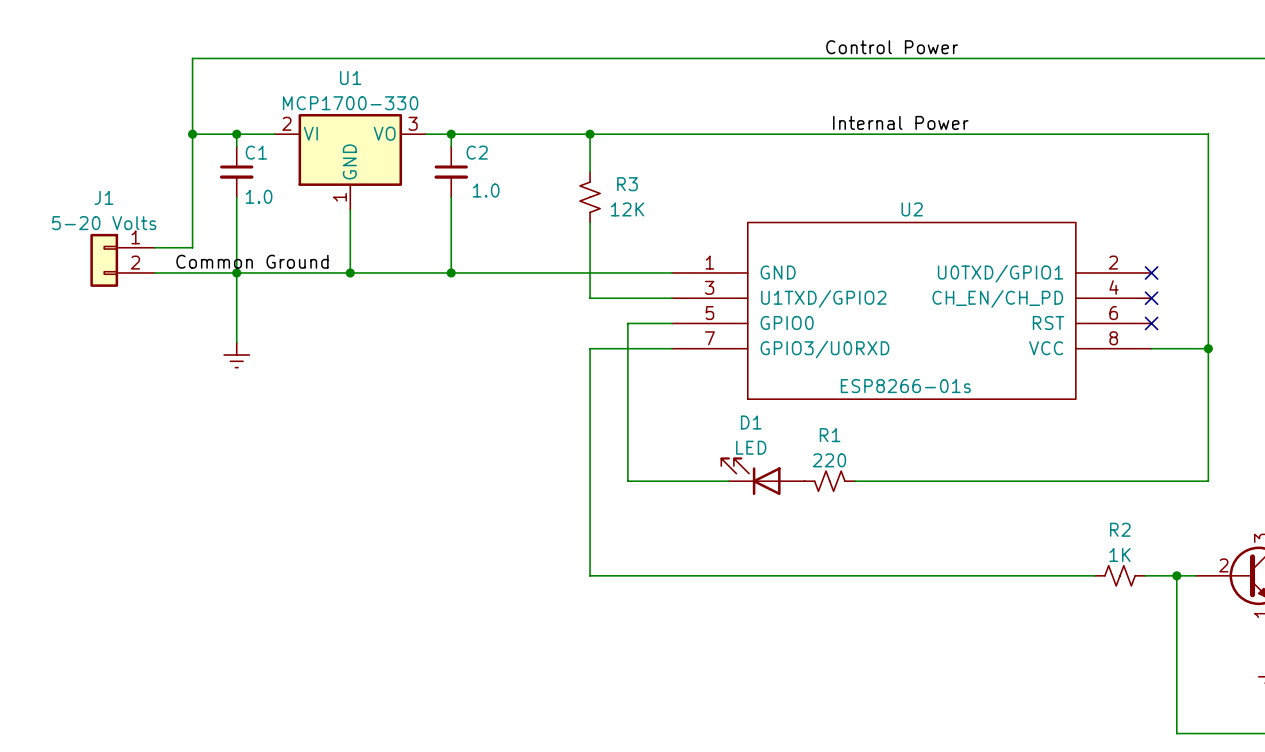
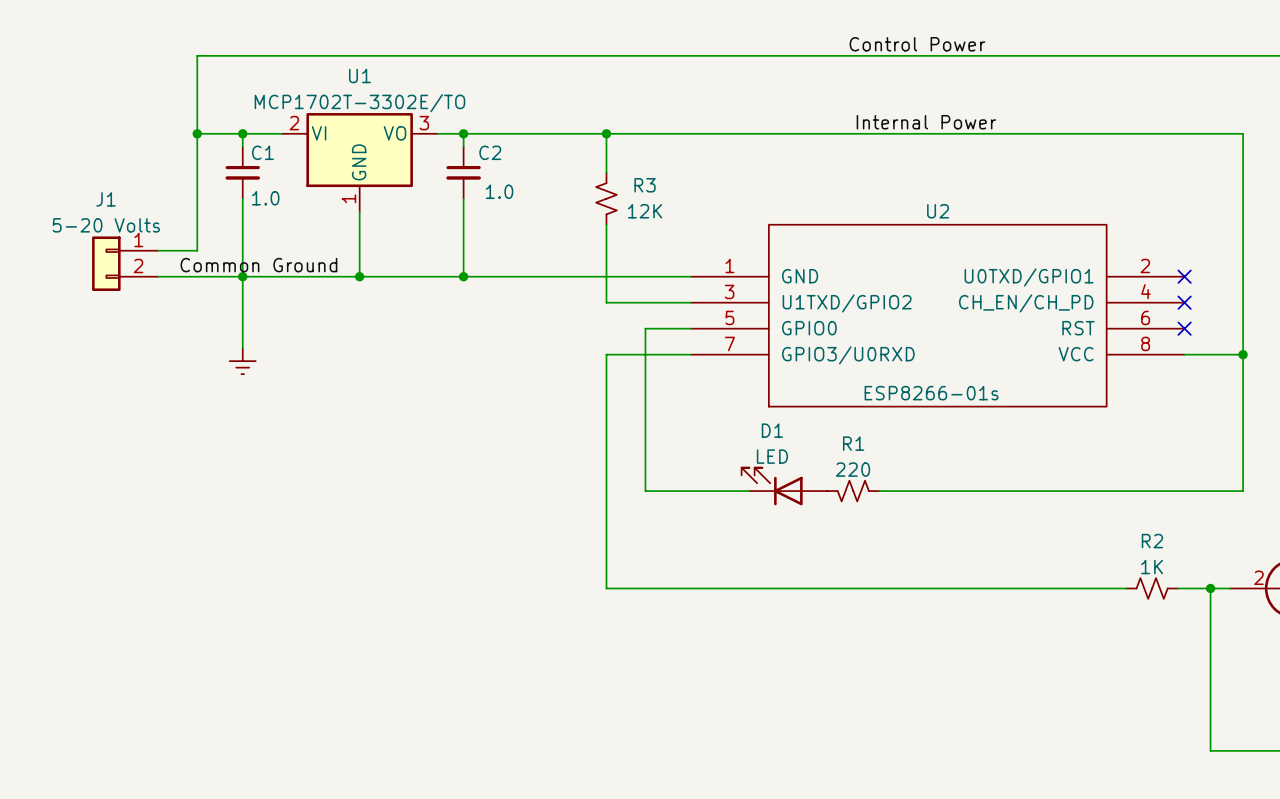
U1 value: MCP1700-330 (350, 103) -> MCP1702T-3302E/TO (359, 103)

